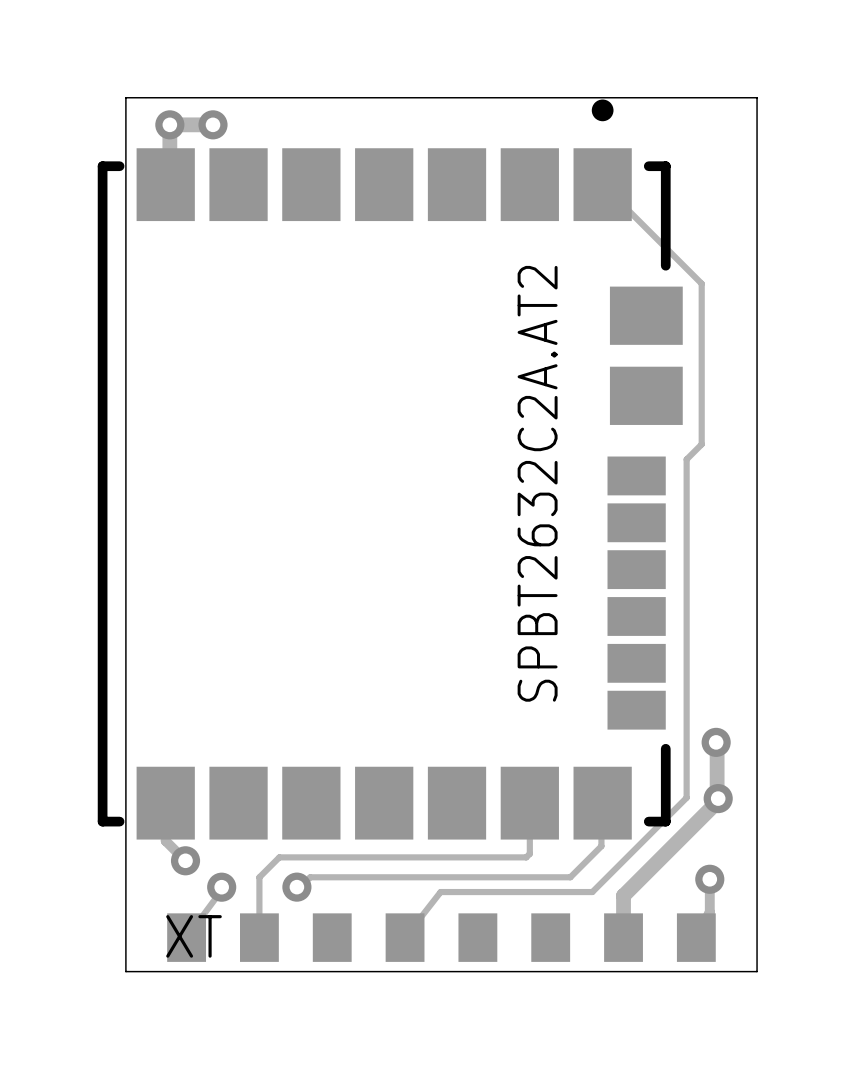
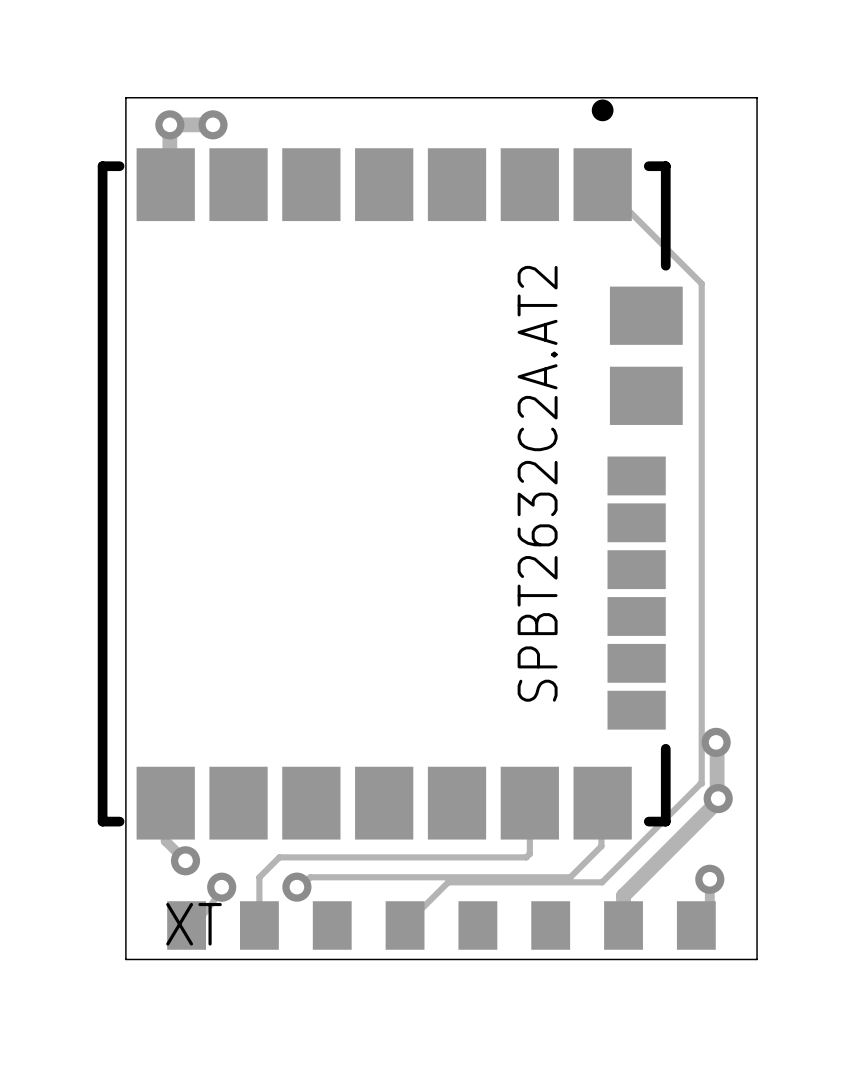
track: (701, 444) (686, 459) (686, 797) -> (701, 444) (701, 783) (686, 797)
track: (602, 882) (592, 892) (440, 892) (405, 937) -> (602, 882) (448, 882) (405, 925)
part position: (441, 937) -> (441, 925)
board edge: (125, 959) (125, 971) (757, 971) (757, 959) -> (125, 959) (757, 959)

